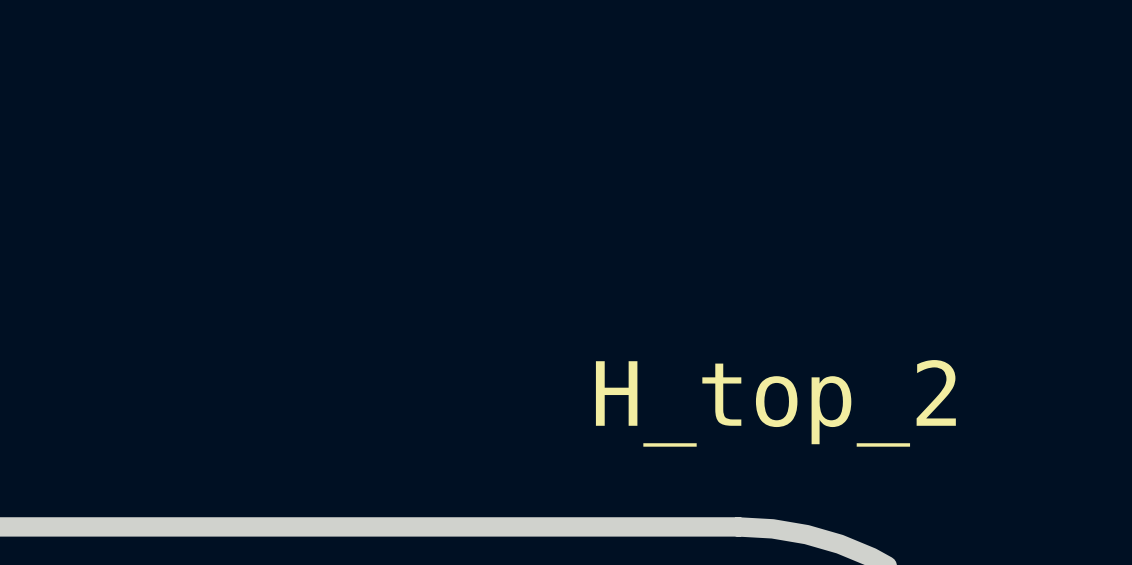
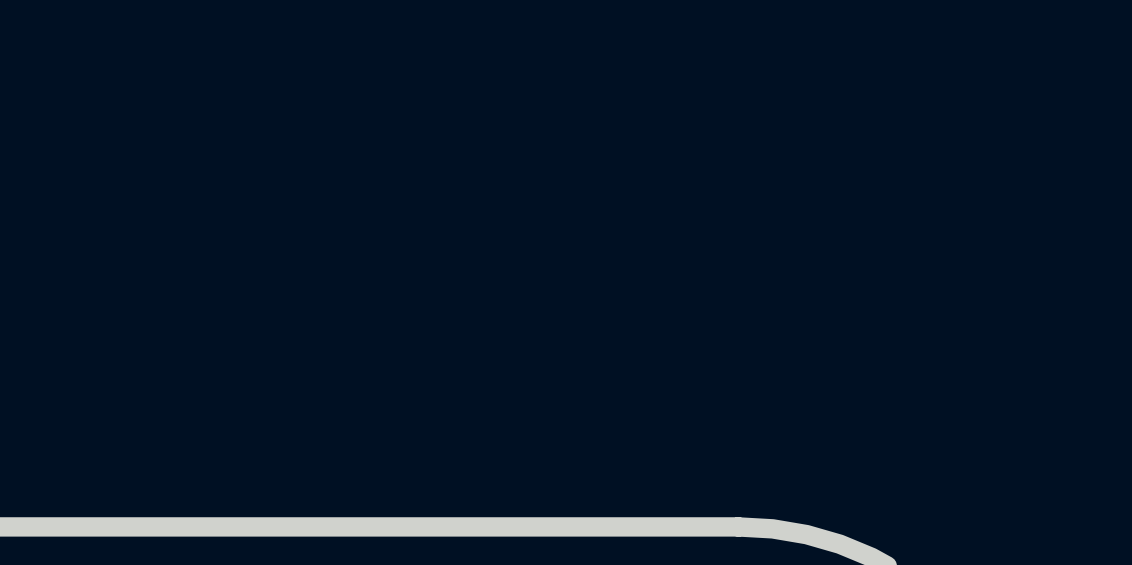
H_top_2 name: H_top_2 (775, 403) -> none

